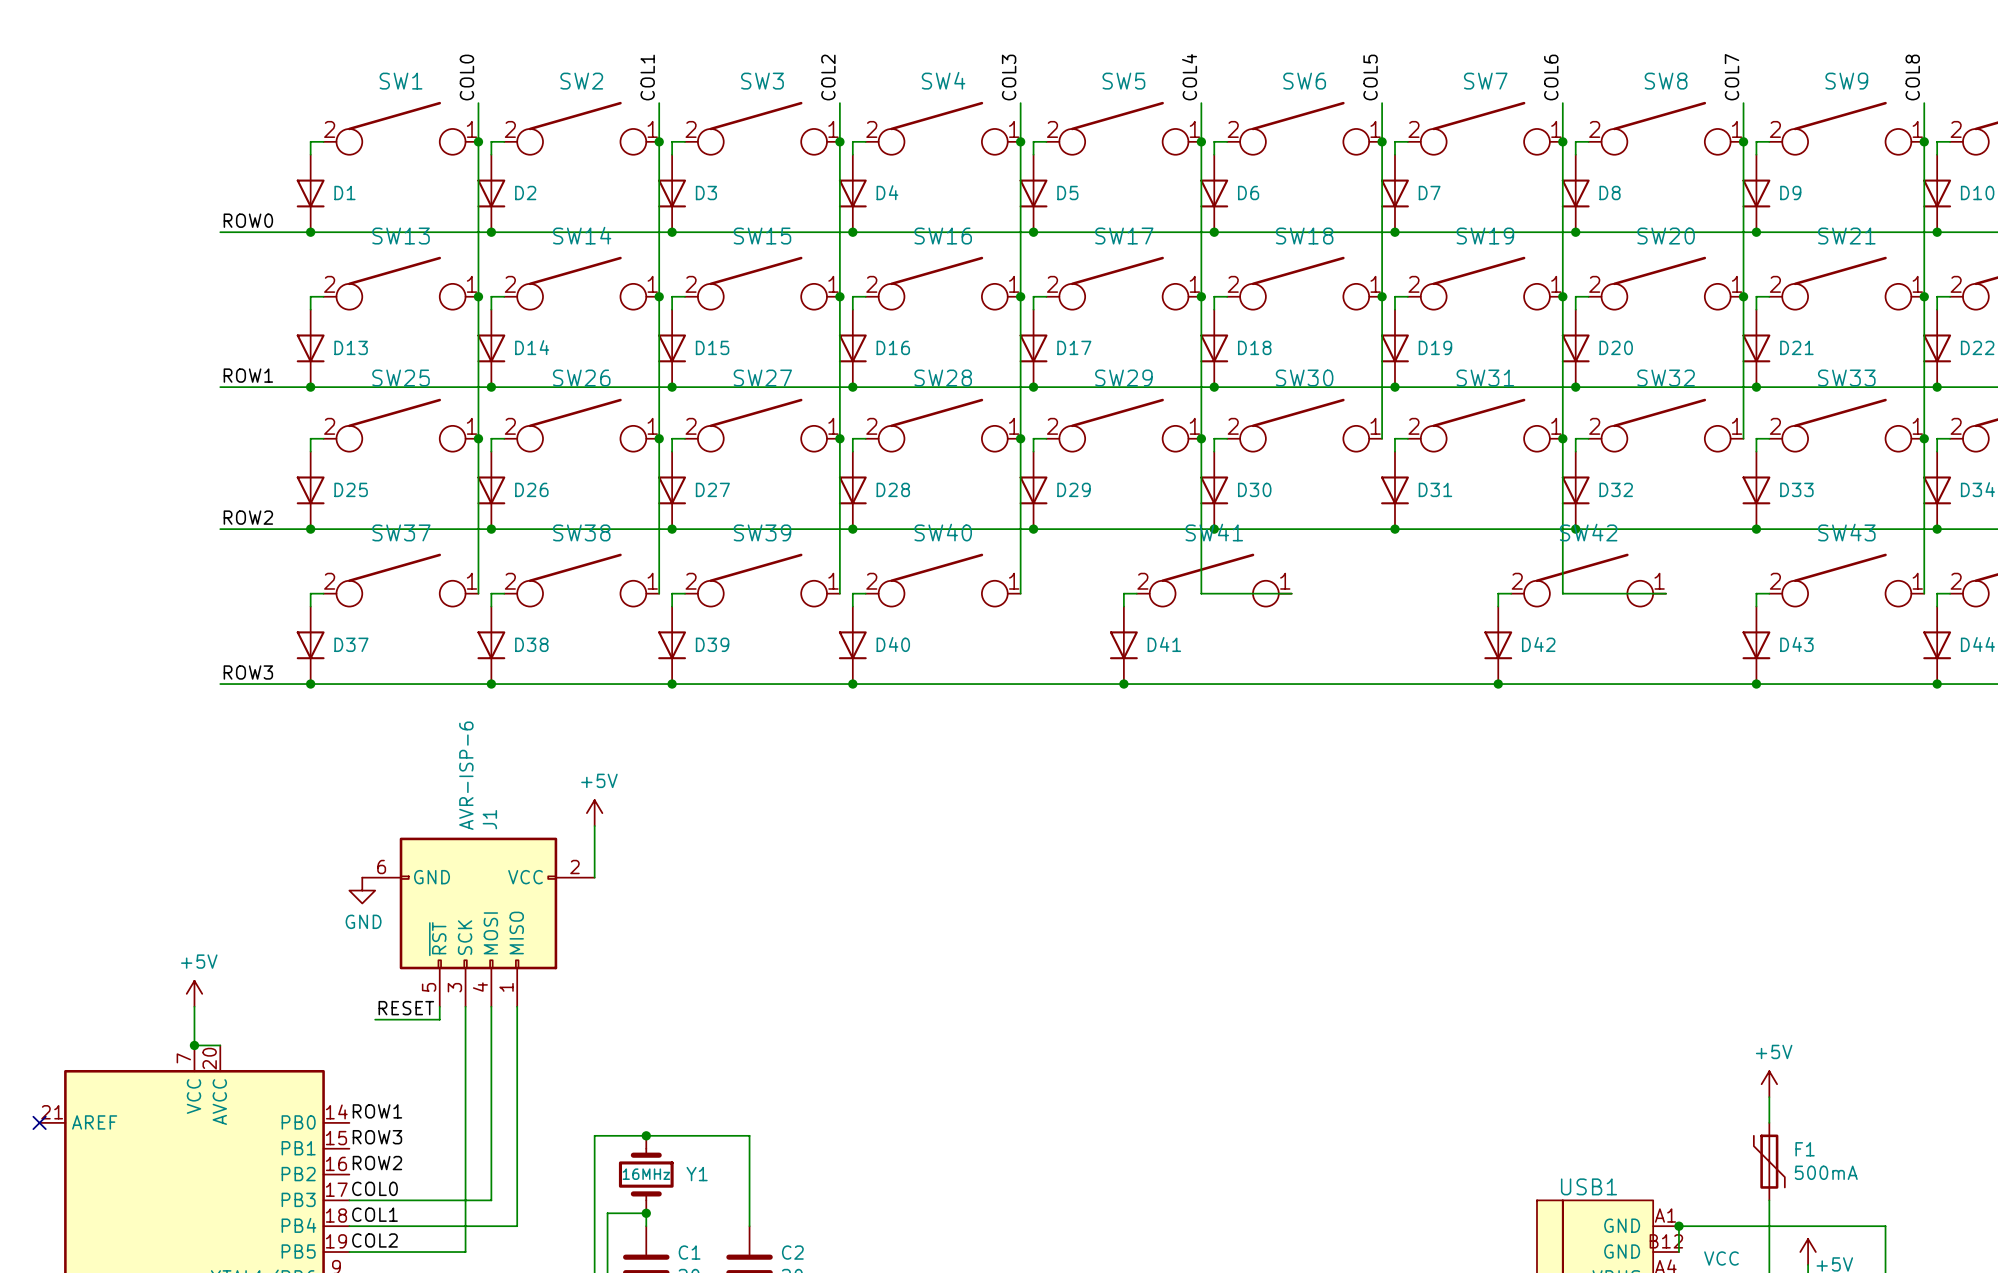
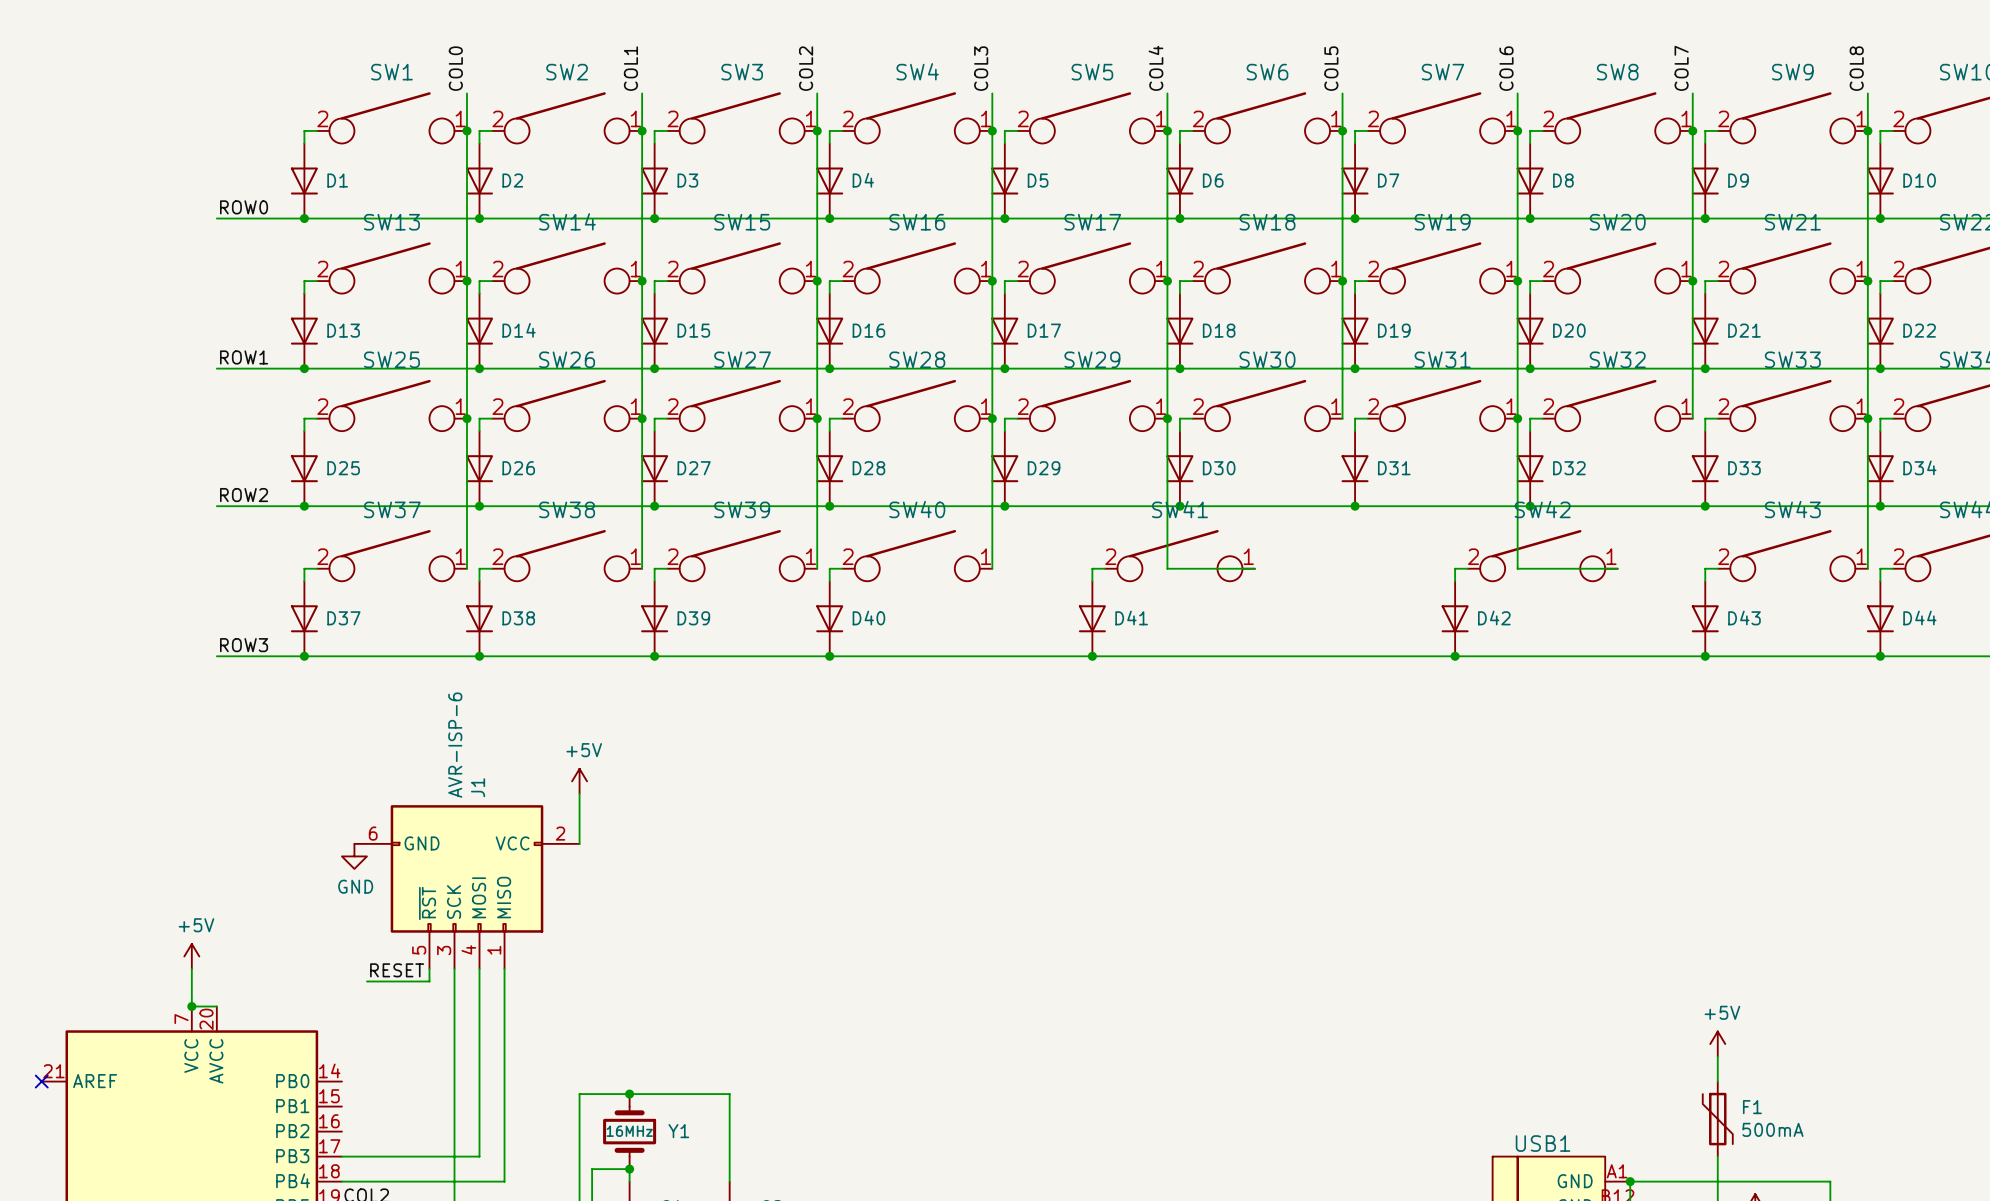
label: ROW1 (377, 1111) -> none
label: ROW3 (377, 1137) -> none
label: ROW2 (377, 1163) -> none
label: COL0 (374, 1188) -> none
label: COL1 (374, 1214) -> none

